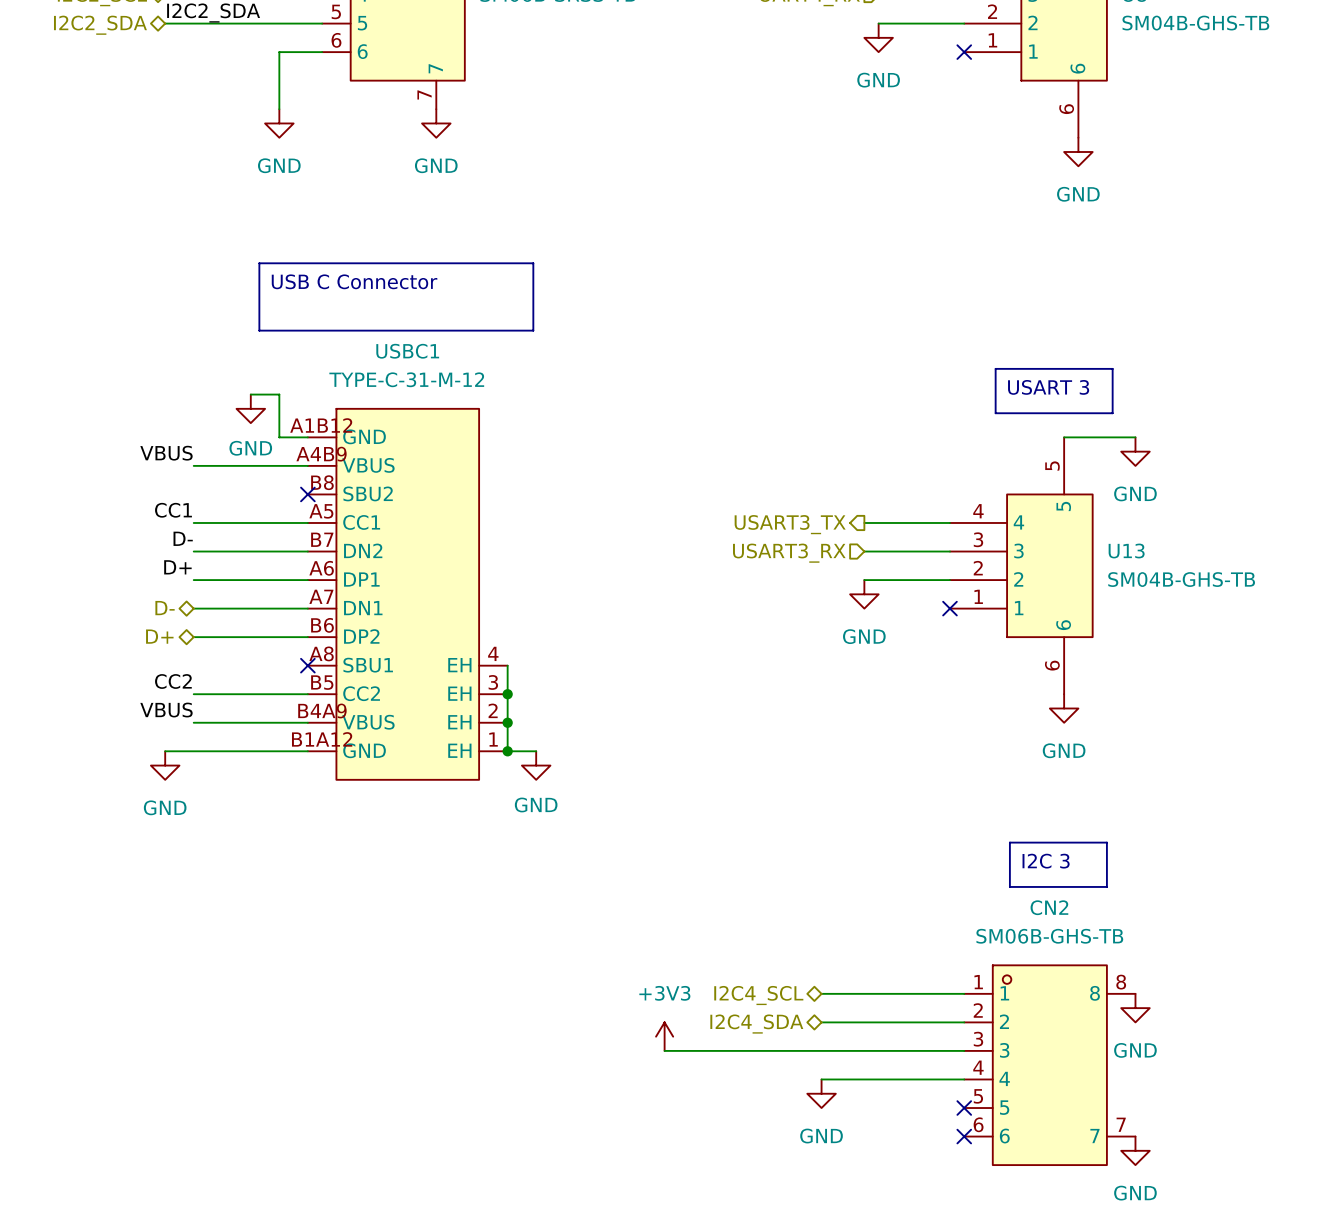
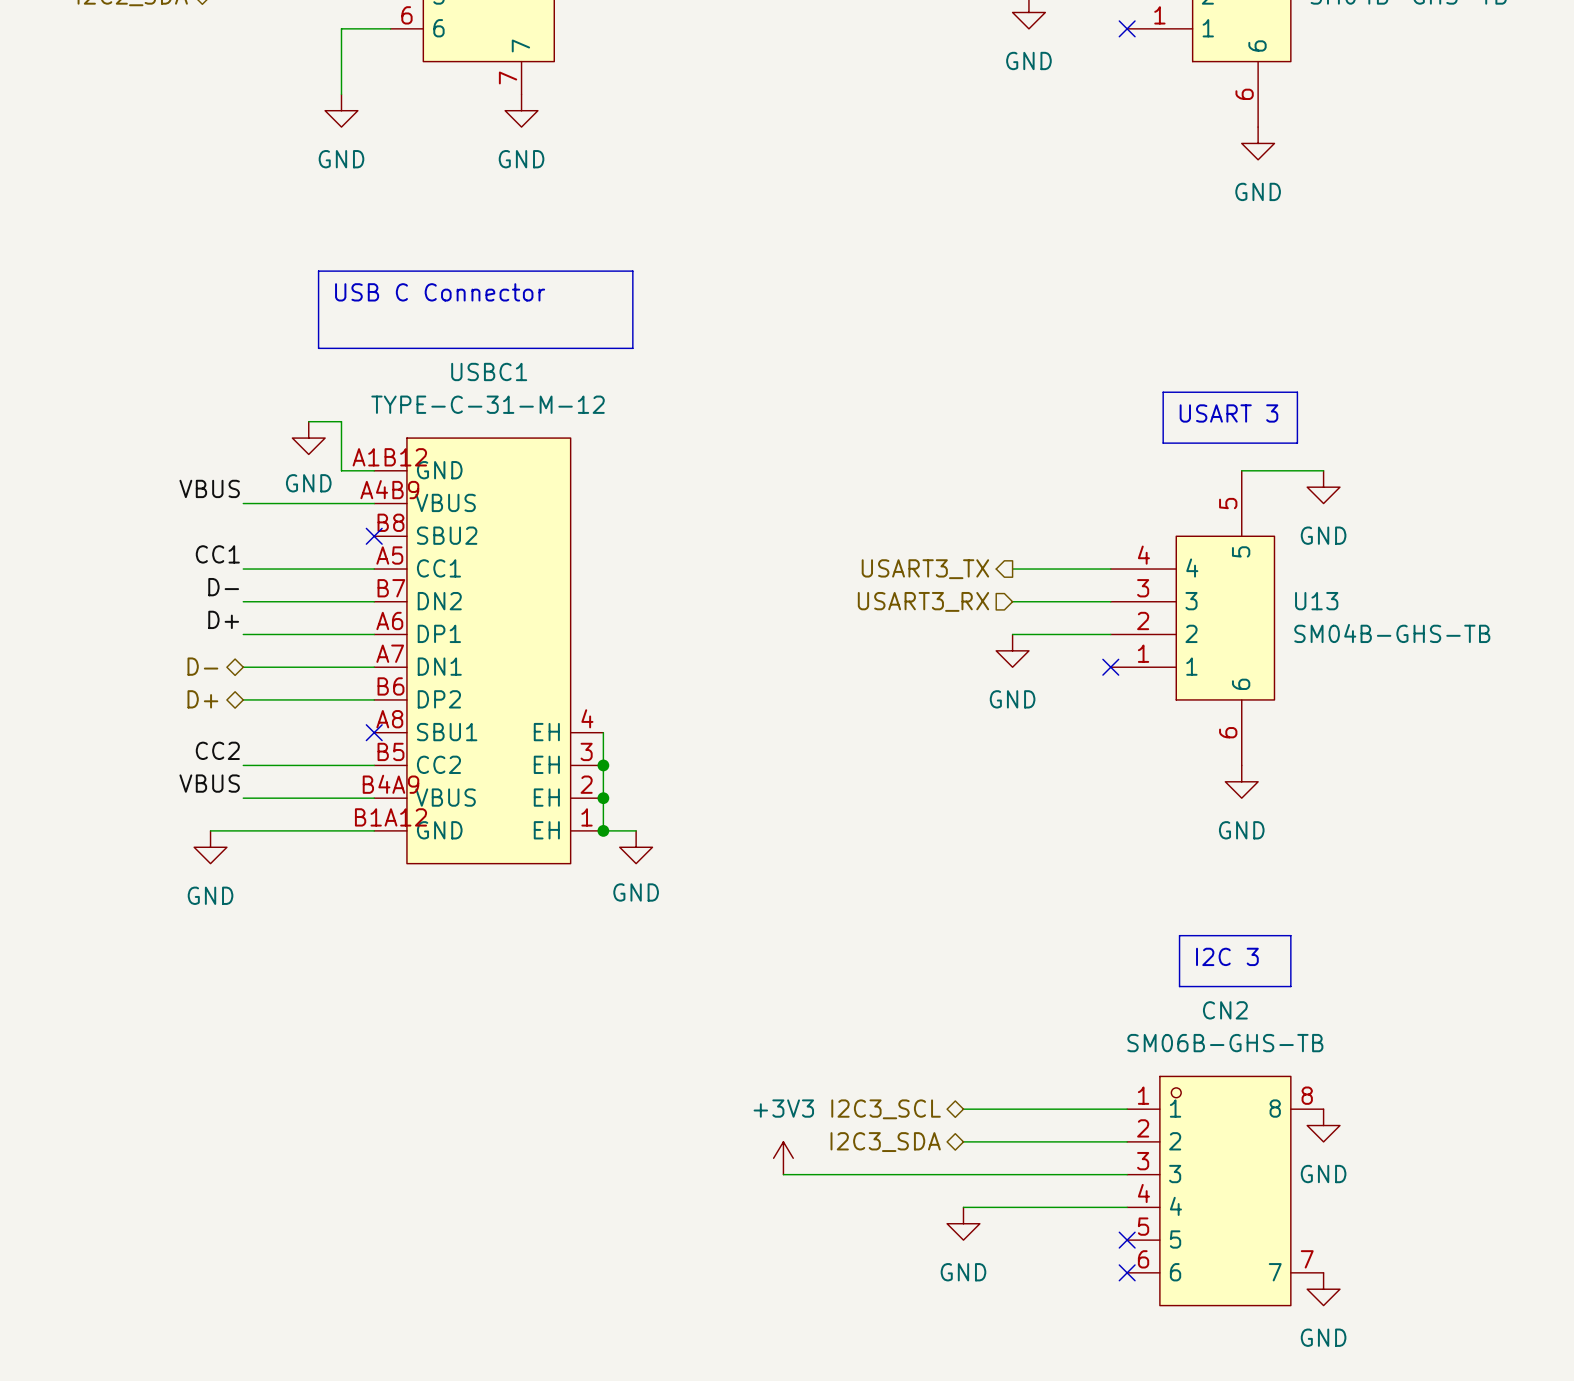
hierarchical label: I2C4_SCL (758, 995) -> I2C3_SCL (886, 1109)
hierarchical label: I2C4_SDA (756, 1024) -> I2C3_SDA (885, 1142)

